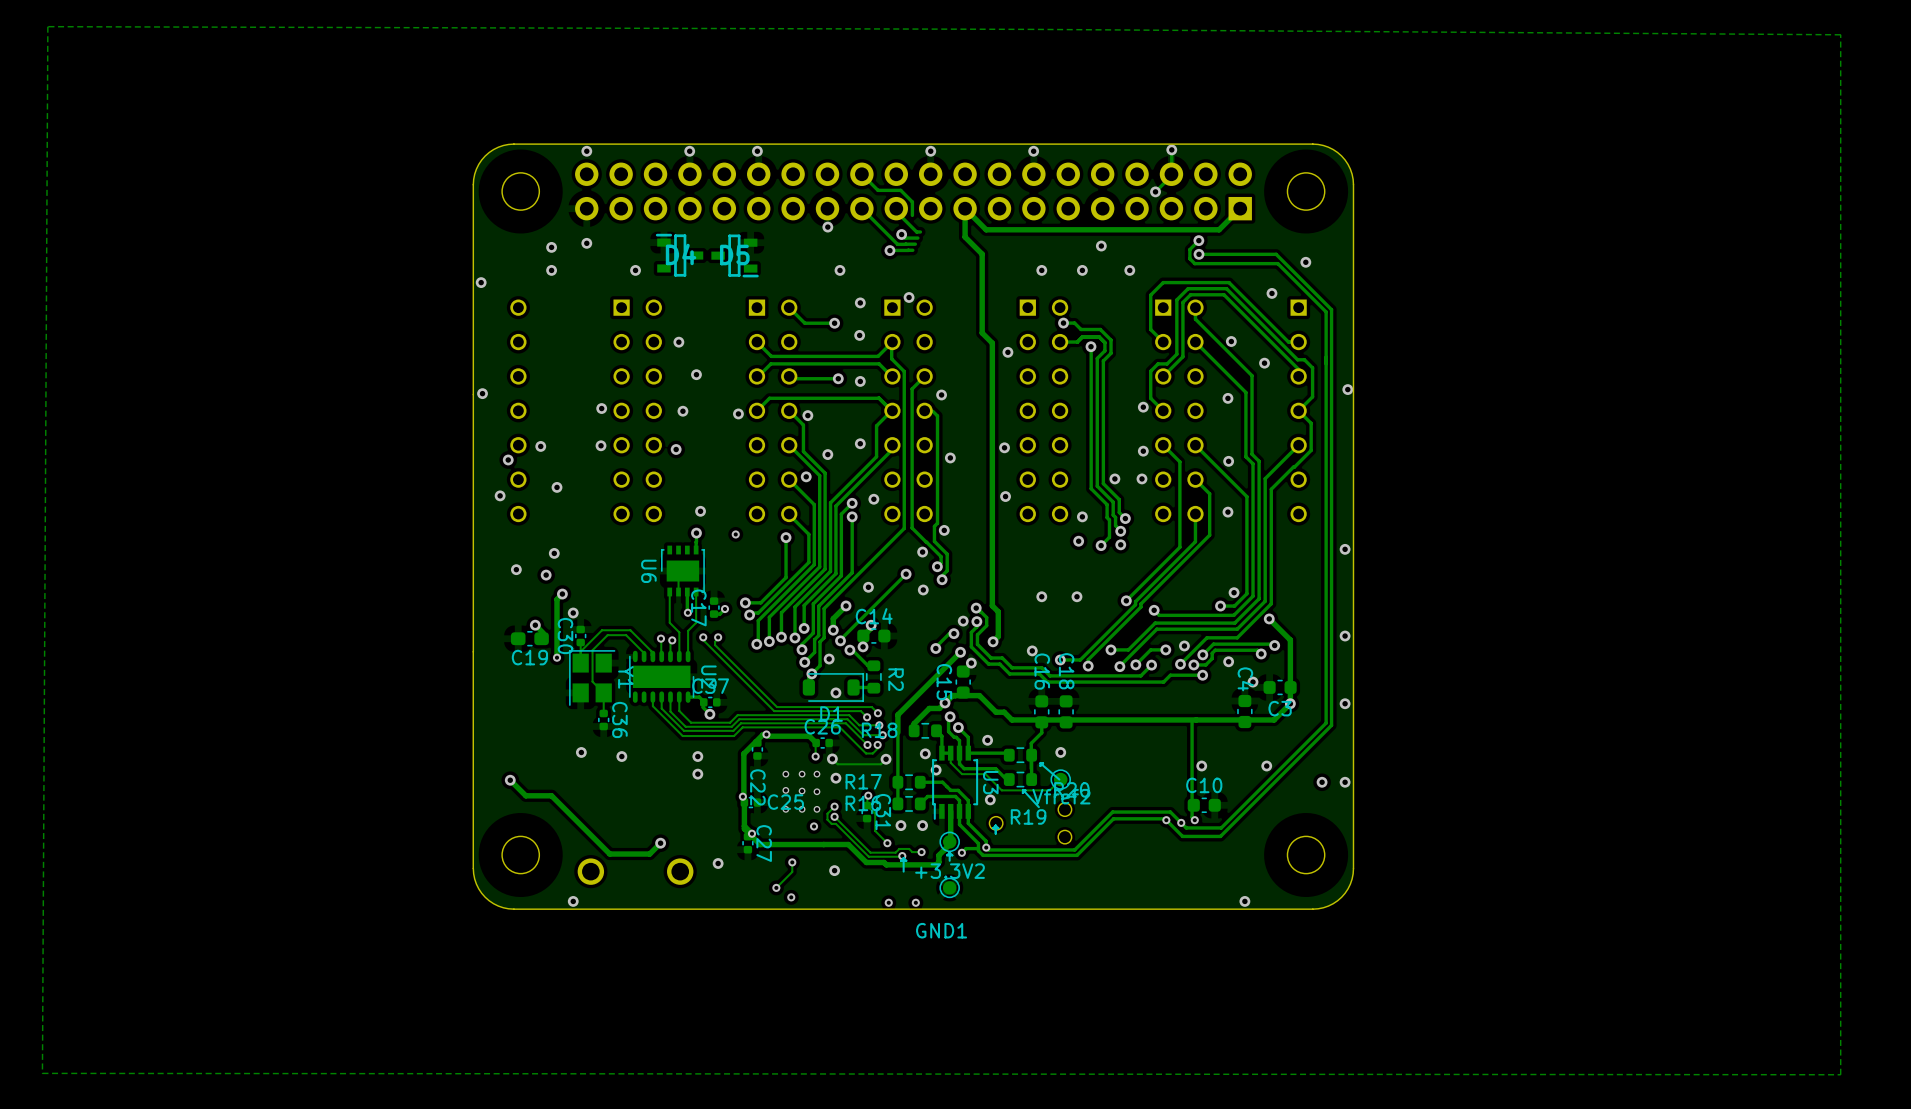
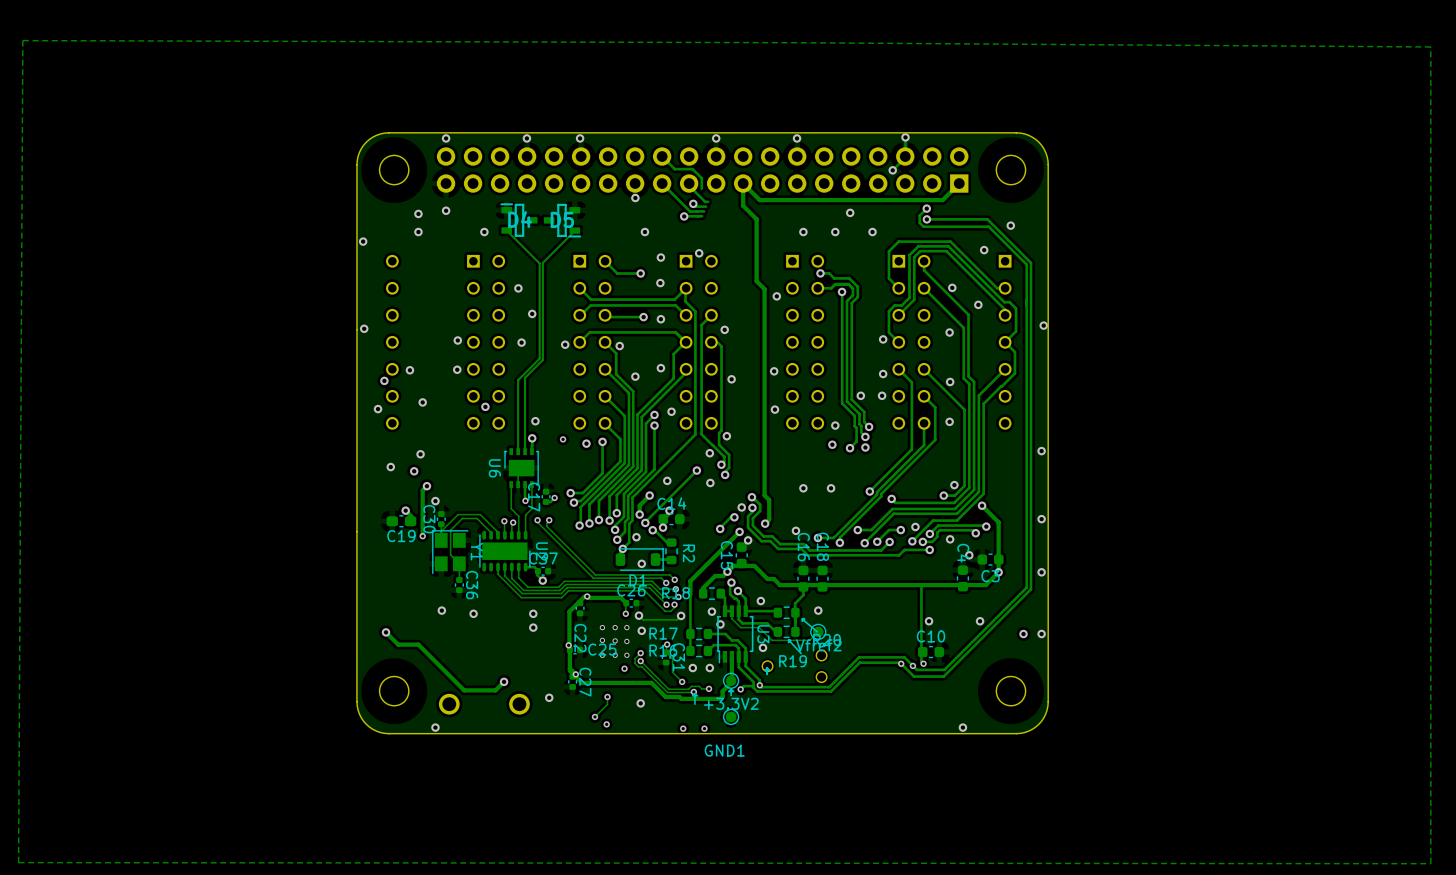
track: none -> (506, 230) (539, 263) (539, 358) (518, 380) (518, 451)
track: none -> (574, 230) (542, 262) (542, 359) (525, 377) (525, 451)
via position: (676, 449) -> (485, 406)
via: (806, 476) -> none
via: none -> (586, 443)

